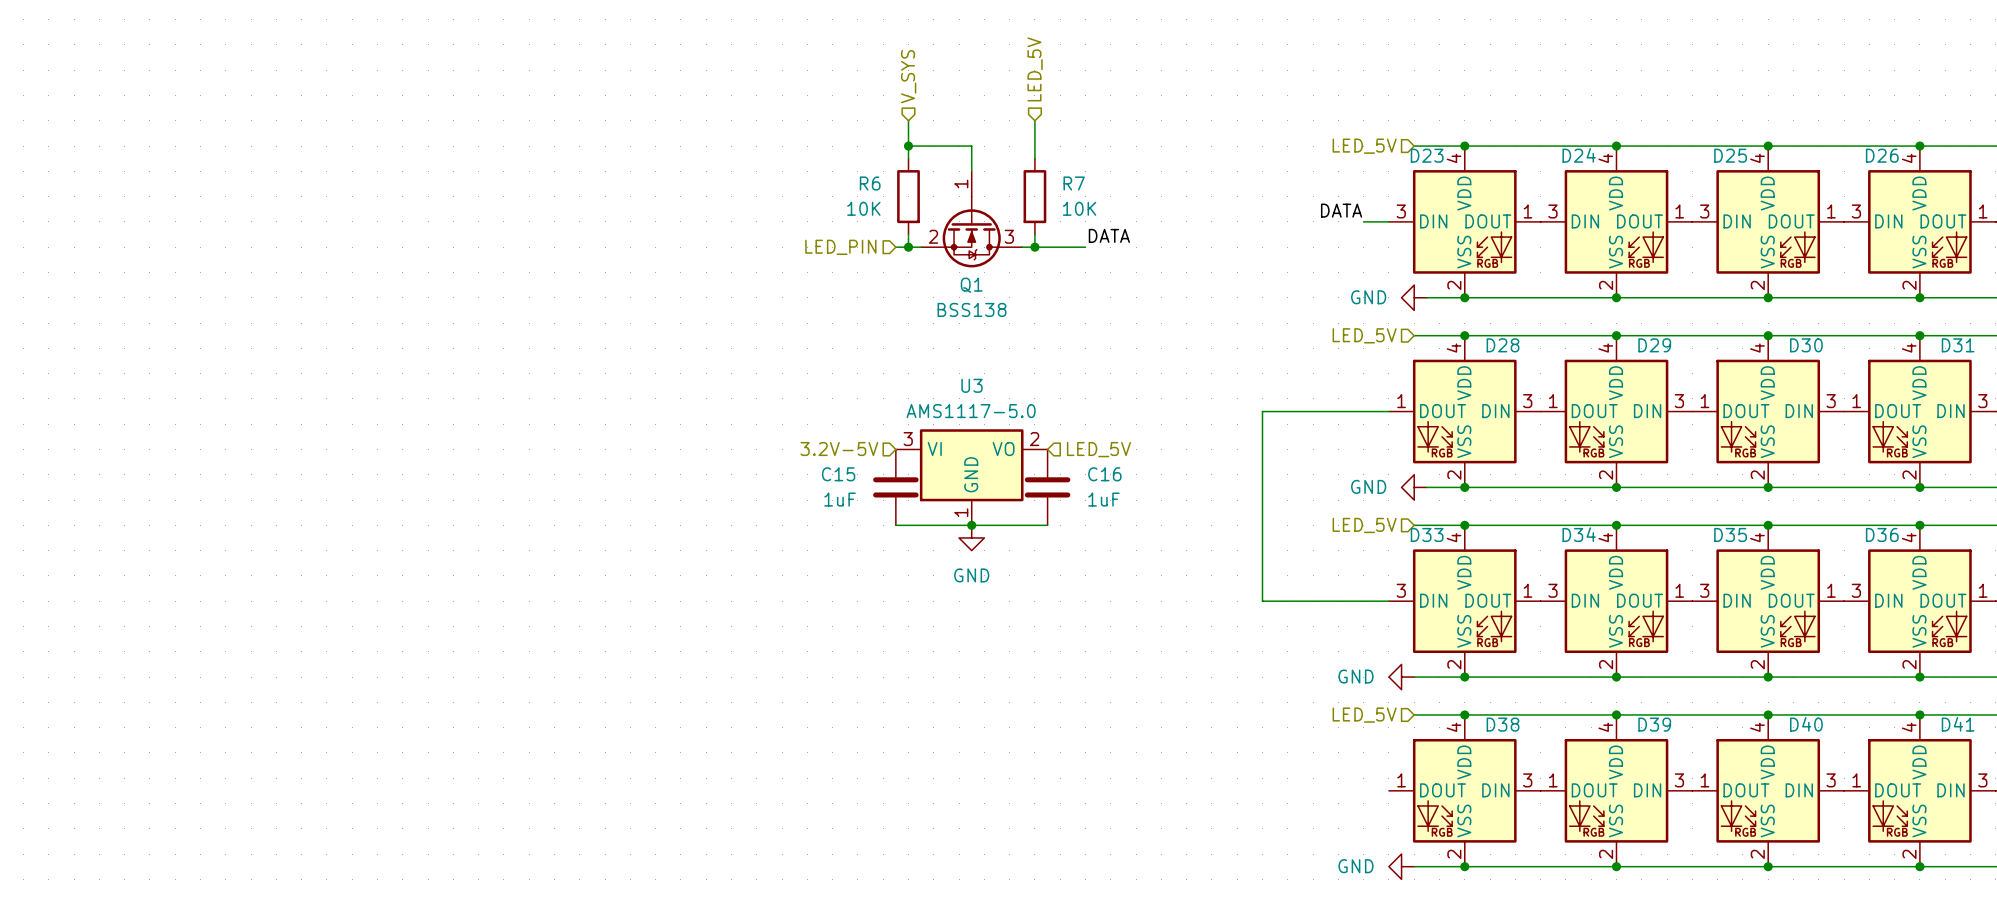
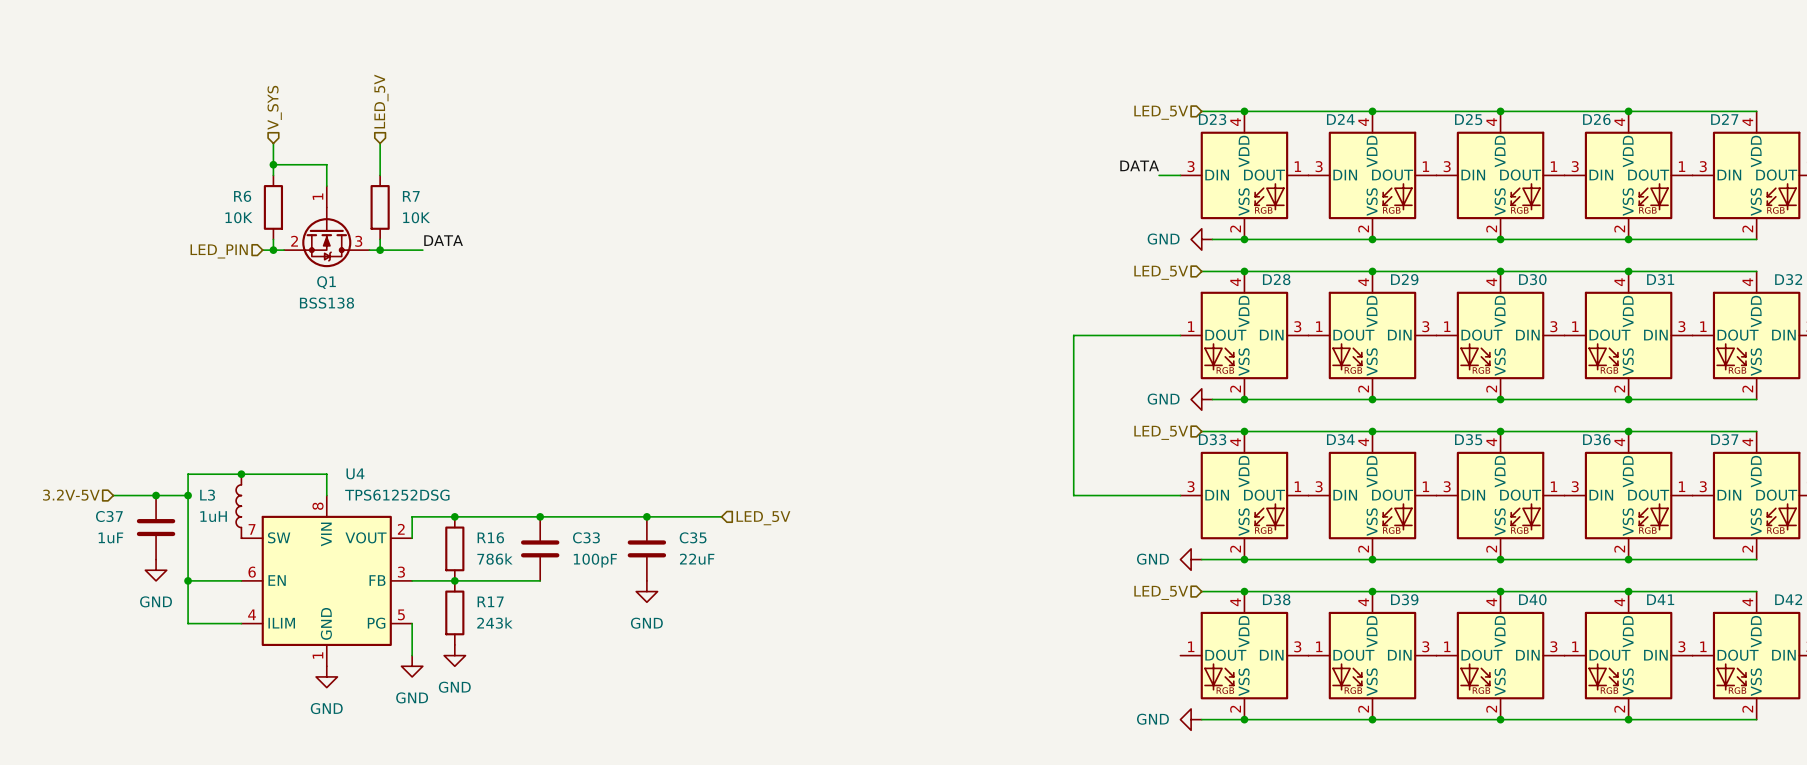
hierarchical label: LED_5V (1035, 69) -> none
hierarchical label: V_SYS (908, 76) -> none
wire: (908, 120) (908, 158) -> none
wire: (1034, 120) (1034, 158) -> none
hierarchical label: none -> LED_5V (381, 101)
hierarchical label: none -> V_SYS (274, 107)
wire: (908, 146) (971, 146) (971, 171) -> none
junction: (908, 146) -> none
wire: none -> (273, 143) (273, 175)
wire: none -> (380, 143) (380, 175)
R6 position: (908, 196) -> (273, 207)
R7 position: (1034, 196) -> (380, 207)
wire: none -> (273, 164) (326, 164) (326, 186)
junction: none -> (273, 164)
Q1 position: (971, 219) -> (326, 226)
wire: (908, 234) (908, 247) -> none
wire: (1034, 234) (1034, 247) -> none
label: DATA (1109, 235) -> none
hierarchical label: LED_PIN (840, 247) -> none
wire: (895, 247) (921, 247) -> none
junction: (908, 247) -> none
wire: (1022, 247) (1085, 247) -> none
junction: (1034, 247) -> none
wire: none -> (273, 239) (273, 250)
wire: none -> (380, 239) (380, 250)
label: none -> DATA (443, 240)
hierarchical label: none -> LED_PIN (219, 251)
wire: none -> (262, 250) (284, 250)
junction: none -> (273, 250)
wire: none -> (369, 250) (422, 250)
junction: none -> (380, 250)
hierarchical label: 3.2V-5V (839, 449) -> none
hierarchical label: LED_5V (1098, 449) -> none
U3: AMS1117-5.0 (971, 477) -> none
C15: 1uF (895, 487) -> none
C16: 1uF (1047, 487) -> none
wire: (895, 525) (1047, 525) -> none
junction: (971, 525) -> none
power symbol: GND (971, 537) -> none
junction: none -> (241, 474)
hierarchical label: none -> 3.2V-5V (71, 495)
wire: none -> (113, 495) (188, 495)
junction: none -> (156, 495)
junction: none -> (188, 495)
wire: none -> (326, 495) (326, 474) (188, 474) (188, 623) (241, 623)
L3: none -> 1uH (238, 506)
junction: none -> (454, 516)
junction: none -> (540, 516)
junction: none -> (646, 516)
wire: none -> (721, 516) (412, 516) (412, 538)
hierarchical label: none -> LED_5V (763, 518)
C37: none -> 1uF (156, 527)
R16: none -> 786k (454, 548)
C33: none -> 100pF (540, 548)
C35: none -> 22uF (646, 548)
power symbol: none -> GND (156, 570)
wire: none -> (188, 580) (241, 580)
junction: none -> (188, 580)
U4: none -> TPS61252DSG (326, 580)
wire: none -> (412, 580) (540, 580)
junction: none -> (454, 580)
power symbol: none -> GND (646, 591)
R17: none -> 243k (454, 612)
wire: none -> (412, 623) (412, 655)
power symbol: none -> GND (454, 655)
power symbol: none -> GND (412, 666)
power symbol: none -> GND (326, 676)

